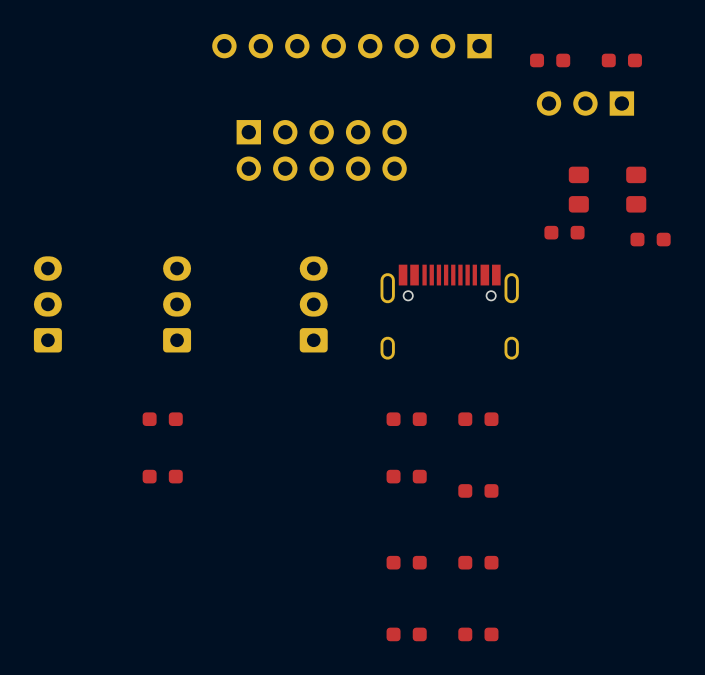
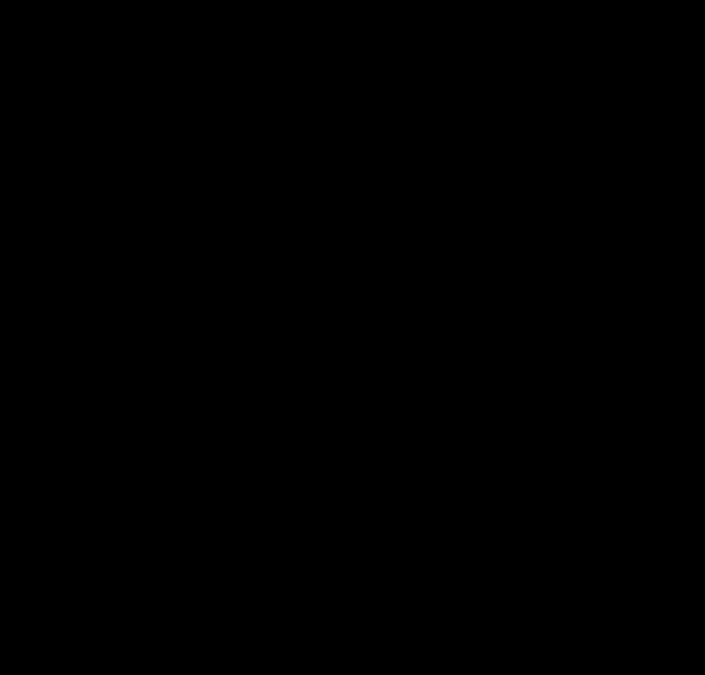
part: (351, 46) -> none
part: (550, 60) -> none
part: (621, 60) -> none
part: (585, 103) -> none
part: (321, 150) -> none
part: (578, 189) -> none
part: (636, 189) -> none
part: (564, 232) -> none
part: (650, 239) -> none
part: (47, 304) -> none
part: (177, 304) -> none
part: (313, 304) -> none
part: (449, 312) -> none
part: (162, 419) -> none
part: (406, 419) -> none
part: (478, 419) -> none
part: (162, 476) -> none
part: (406, 476) -> none
part: (478, 490) -> none
part: (406, 562) -> none
part: (478, 562) -> none
part: (406, 634) -> none
part: (478, 634) -> none

